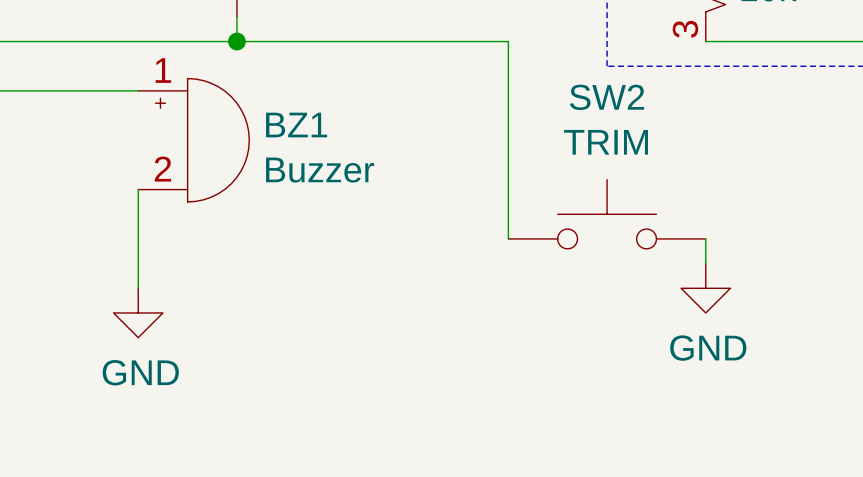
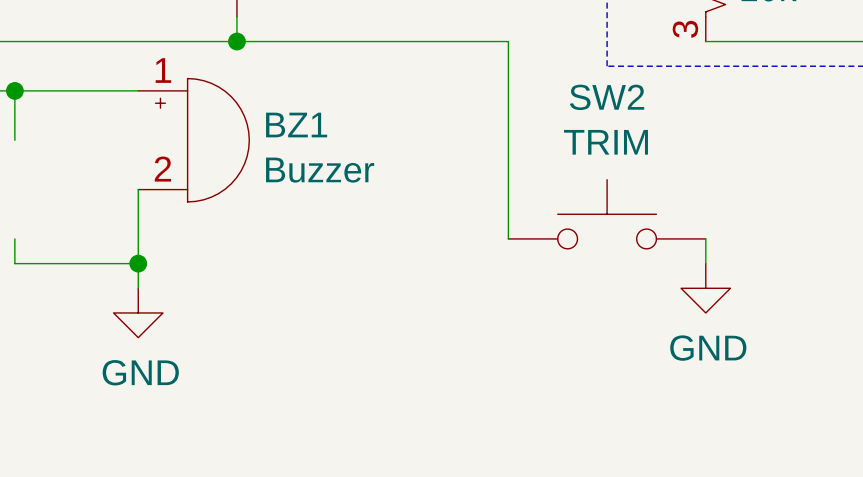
wire: none -> (14, 90) (14, 140)
junction: none -> (14, 90)
wire: none -> (14, 238) (14, 263) (138, 263)
junction: none -> (138, 263)

